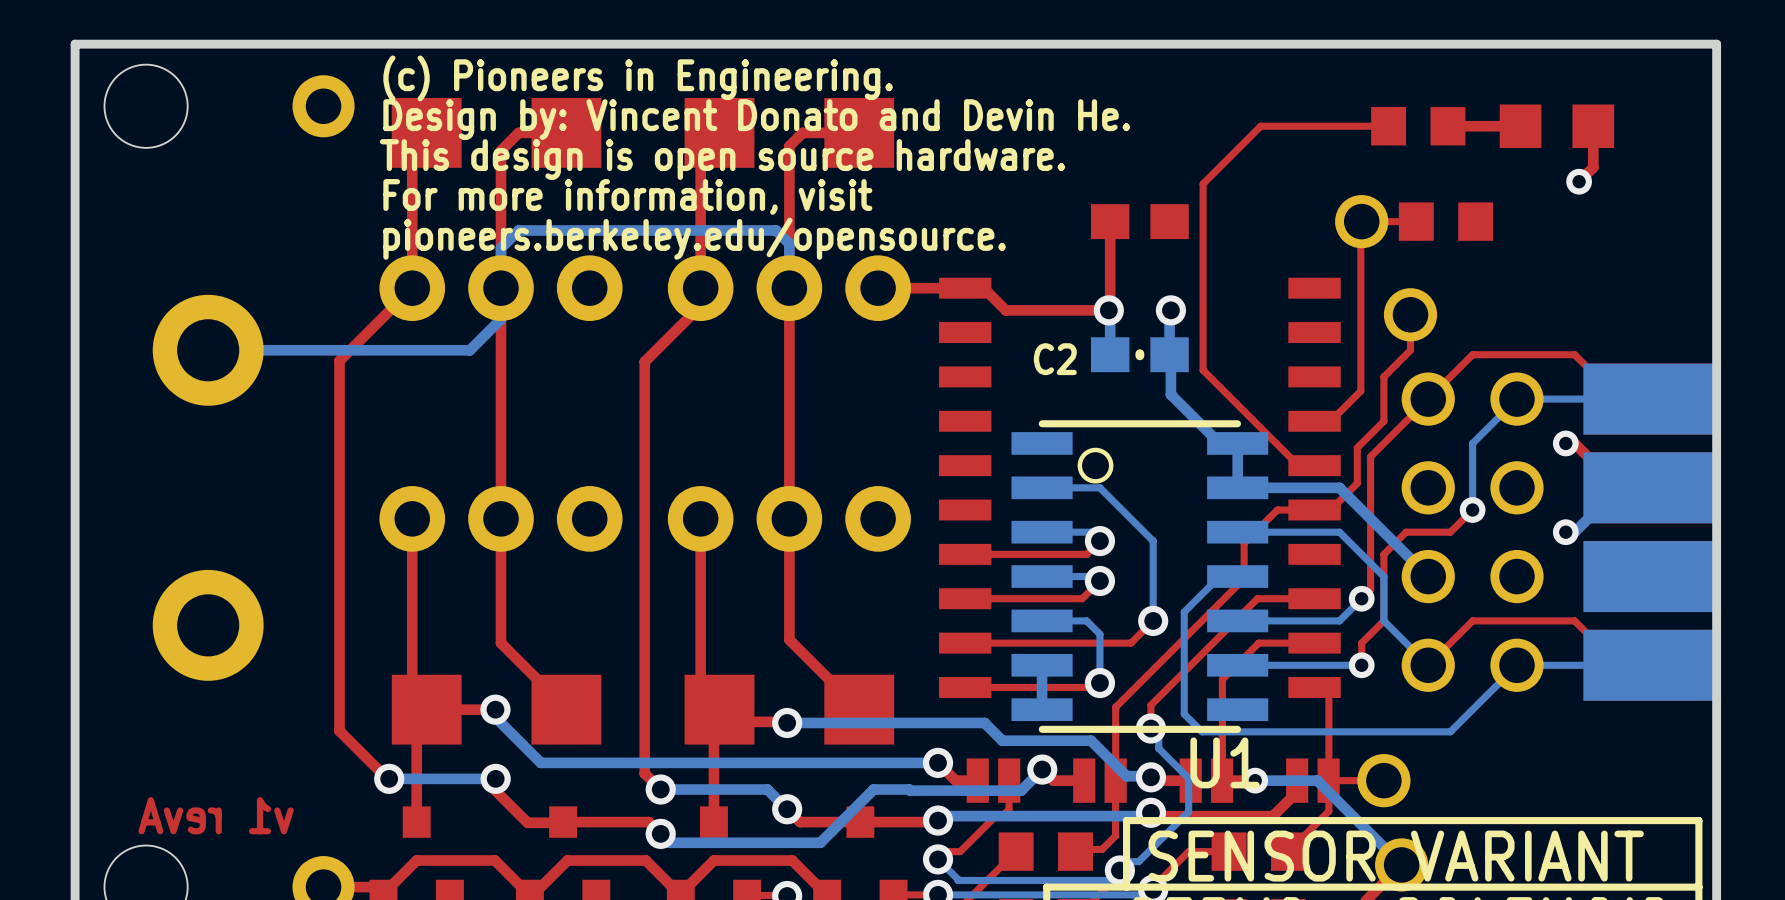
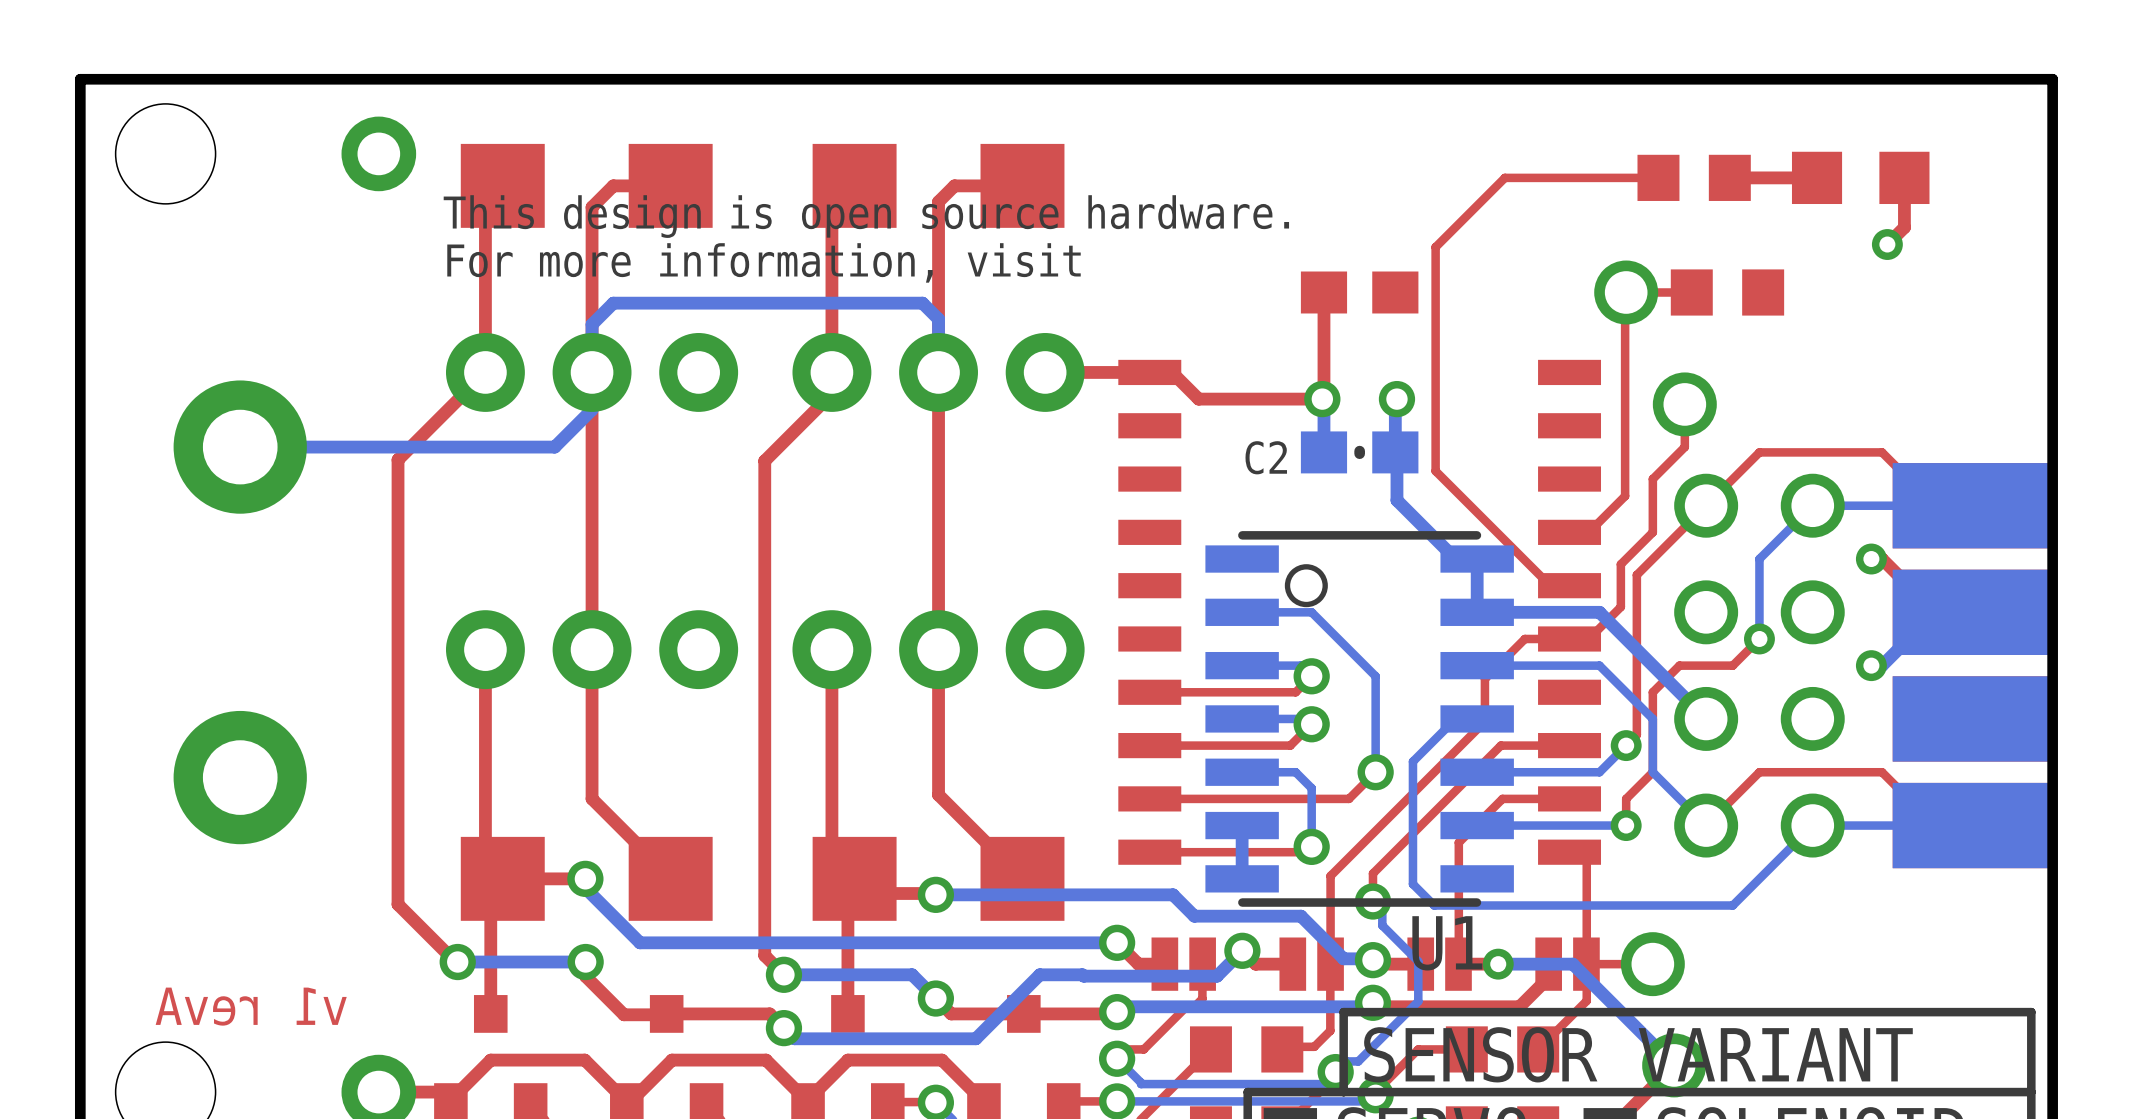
text: (c) Pioneers in Engineering. (638, 78) -> none
text: Design by: Vincent Donato and Devin He. (756, 119) -> none
text: pioneers.berkeley.edu/opensource. (694, 238) -> none

